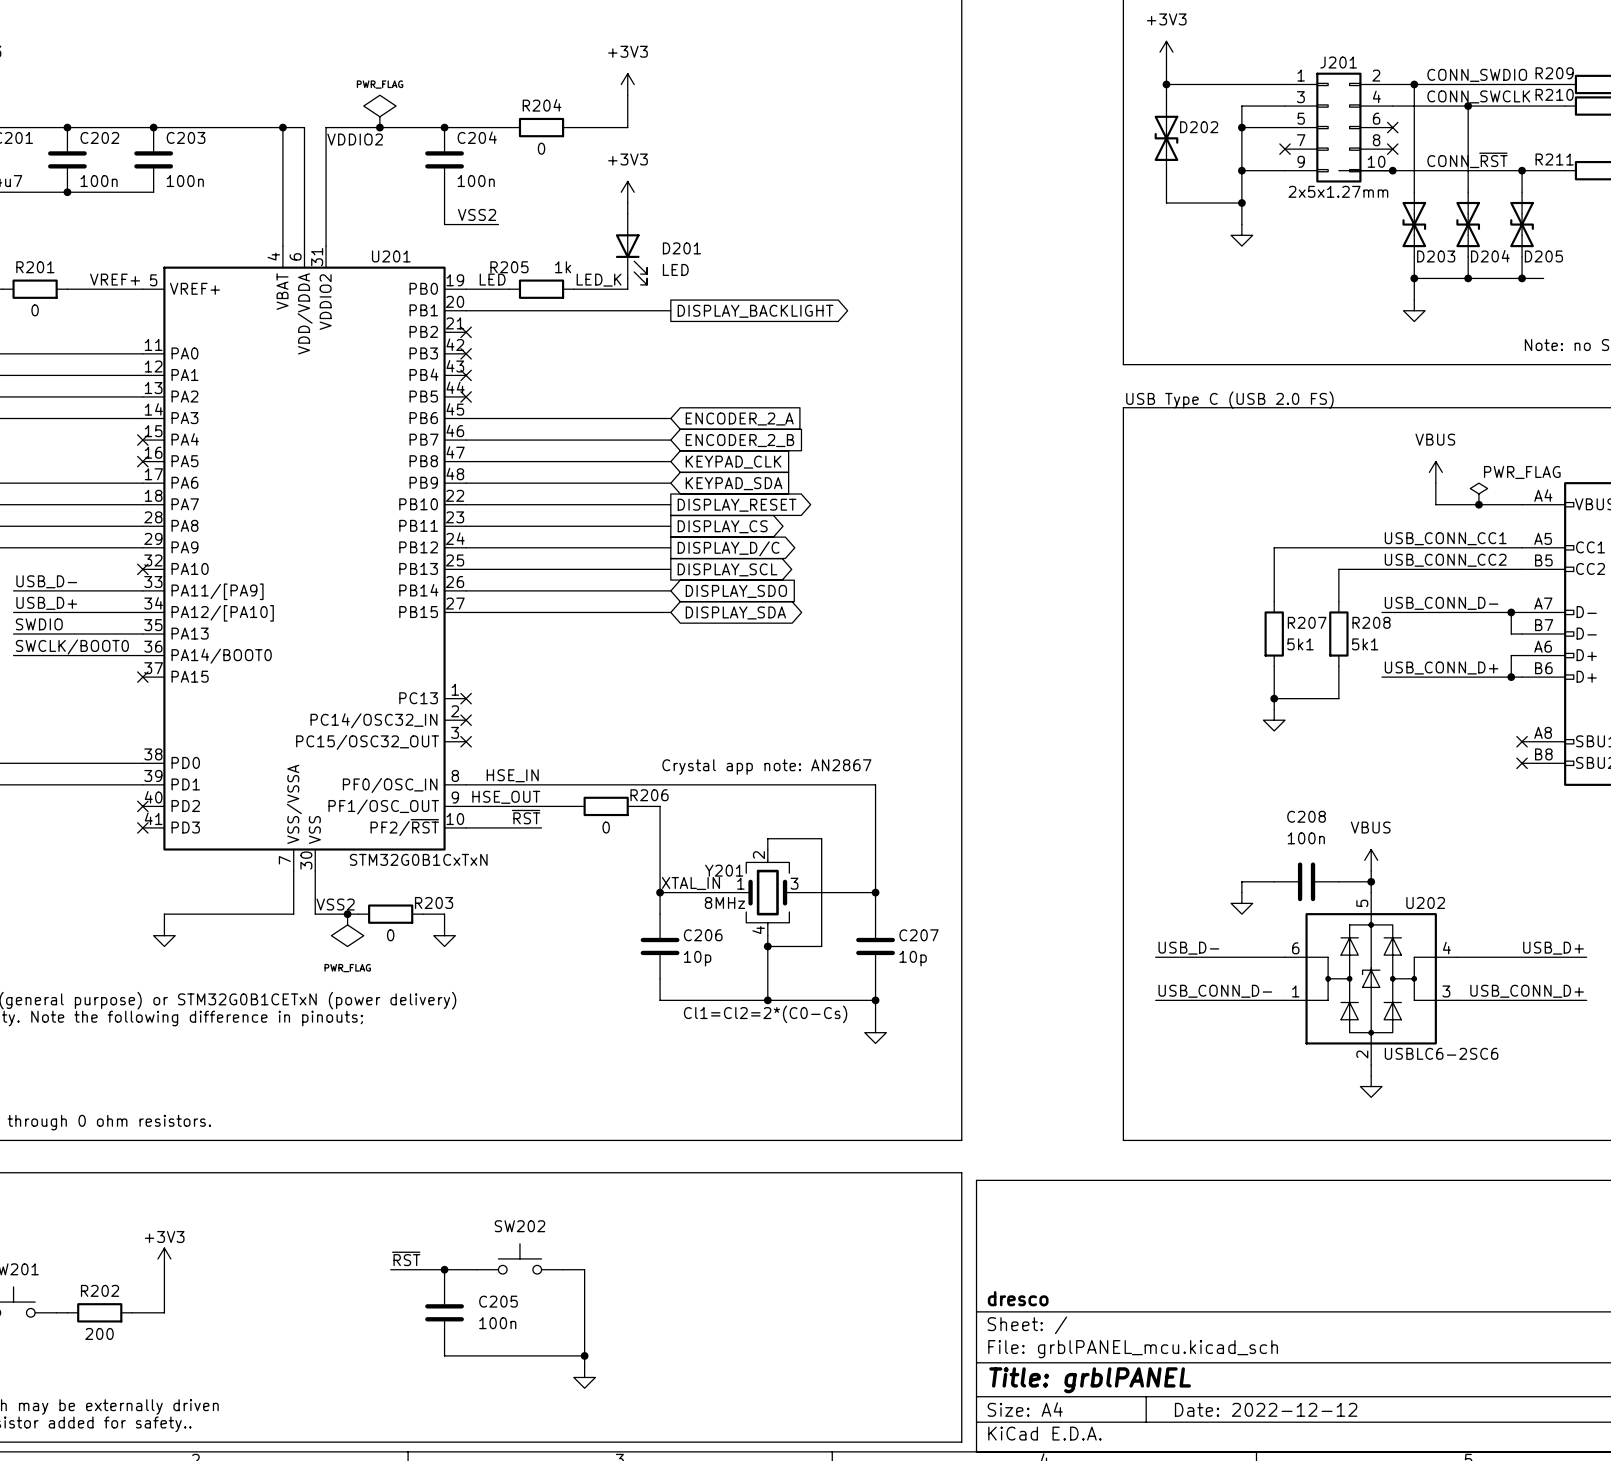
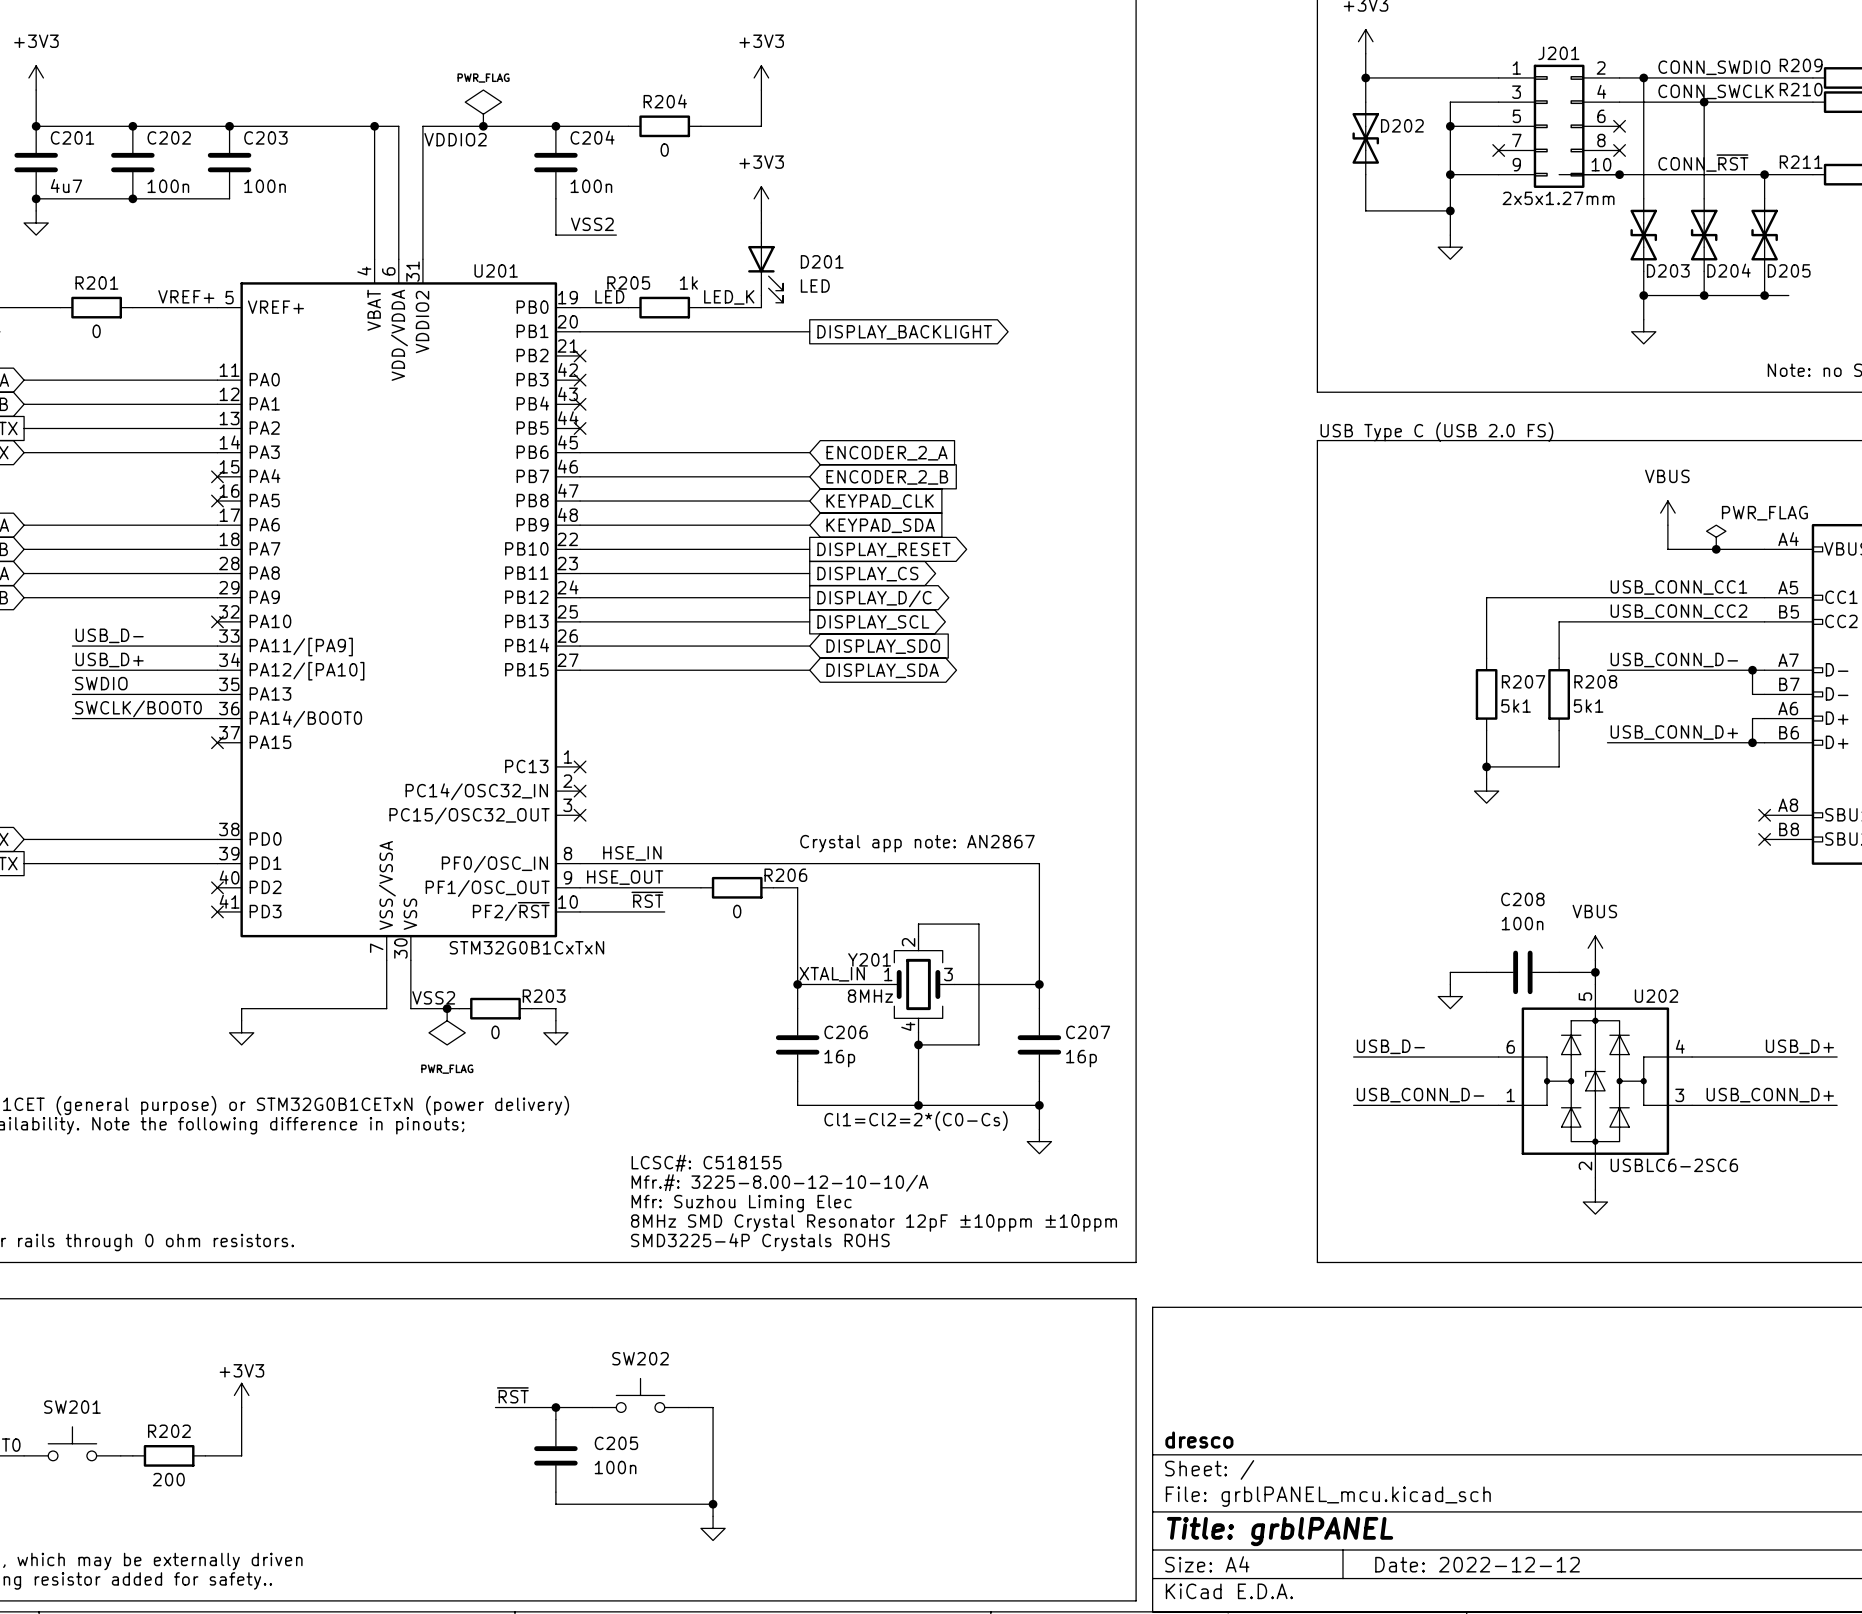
C206 value: 10p (697, 958) -> 16p (839, 1058)
C207 value: 10p (913, 958) -> 16p (1081, 1058)
text: none -> LCSC#: C518155 (706, 1163)
text: none -> Mfr.#: 3225-8.00-12-10-10/A (779, 1182)
text: none -> Mfr: Suzhou Liming Elec (741, 1203)
text: none -> 8MHz SMD Crystal Resonator 12pF ±10ppm ±10ppm (874, 1223)
text: none -> SMD3225-4P Crystals ROHS (760, 1242)

